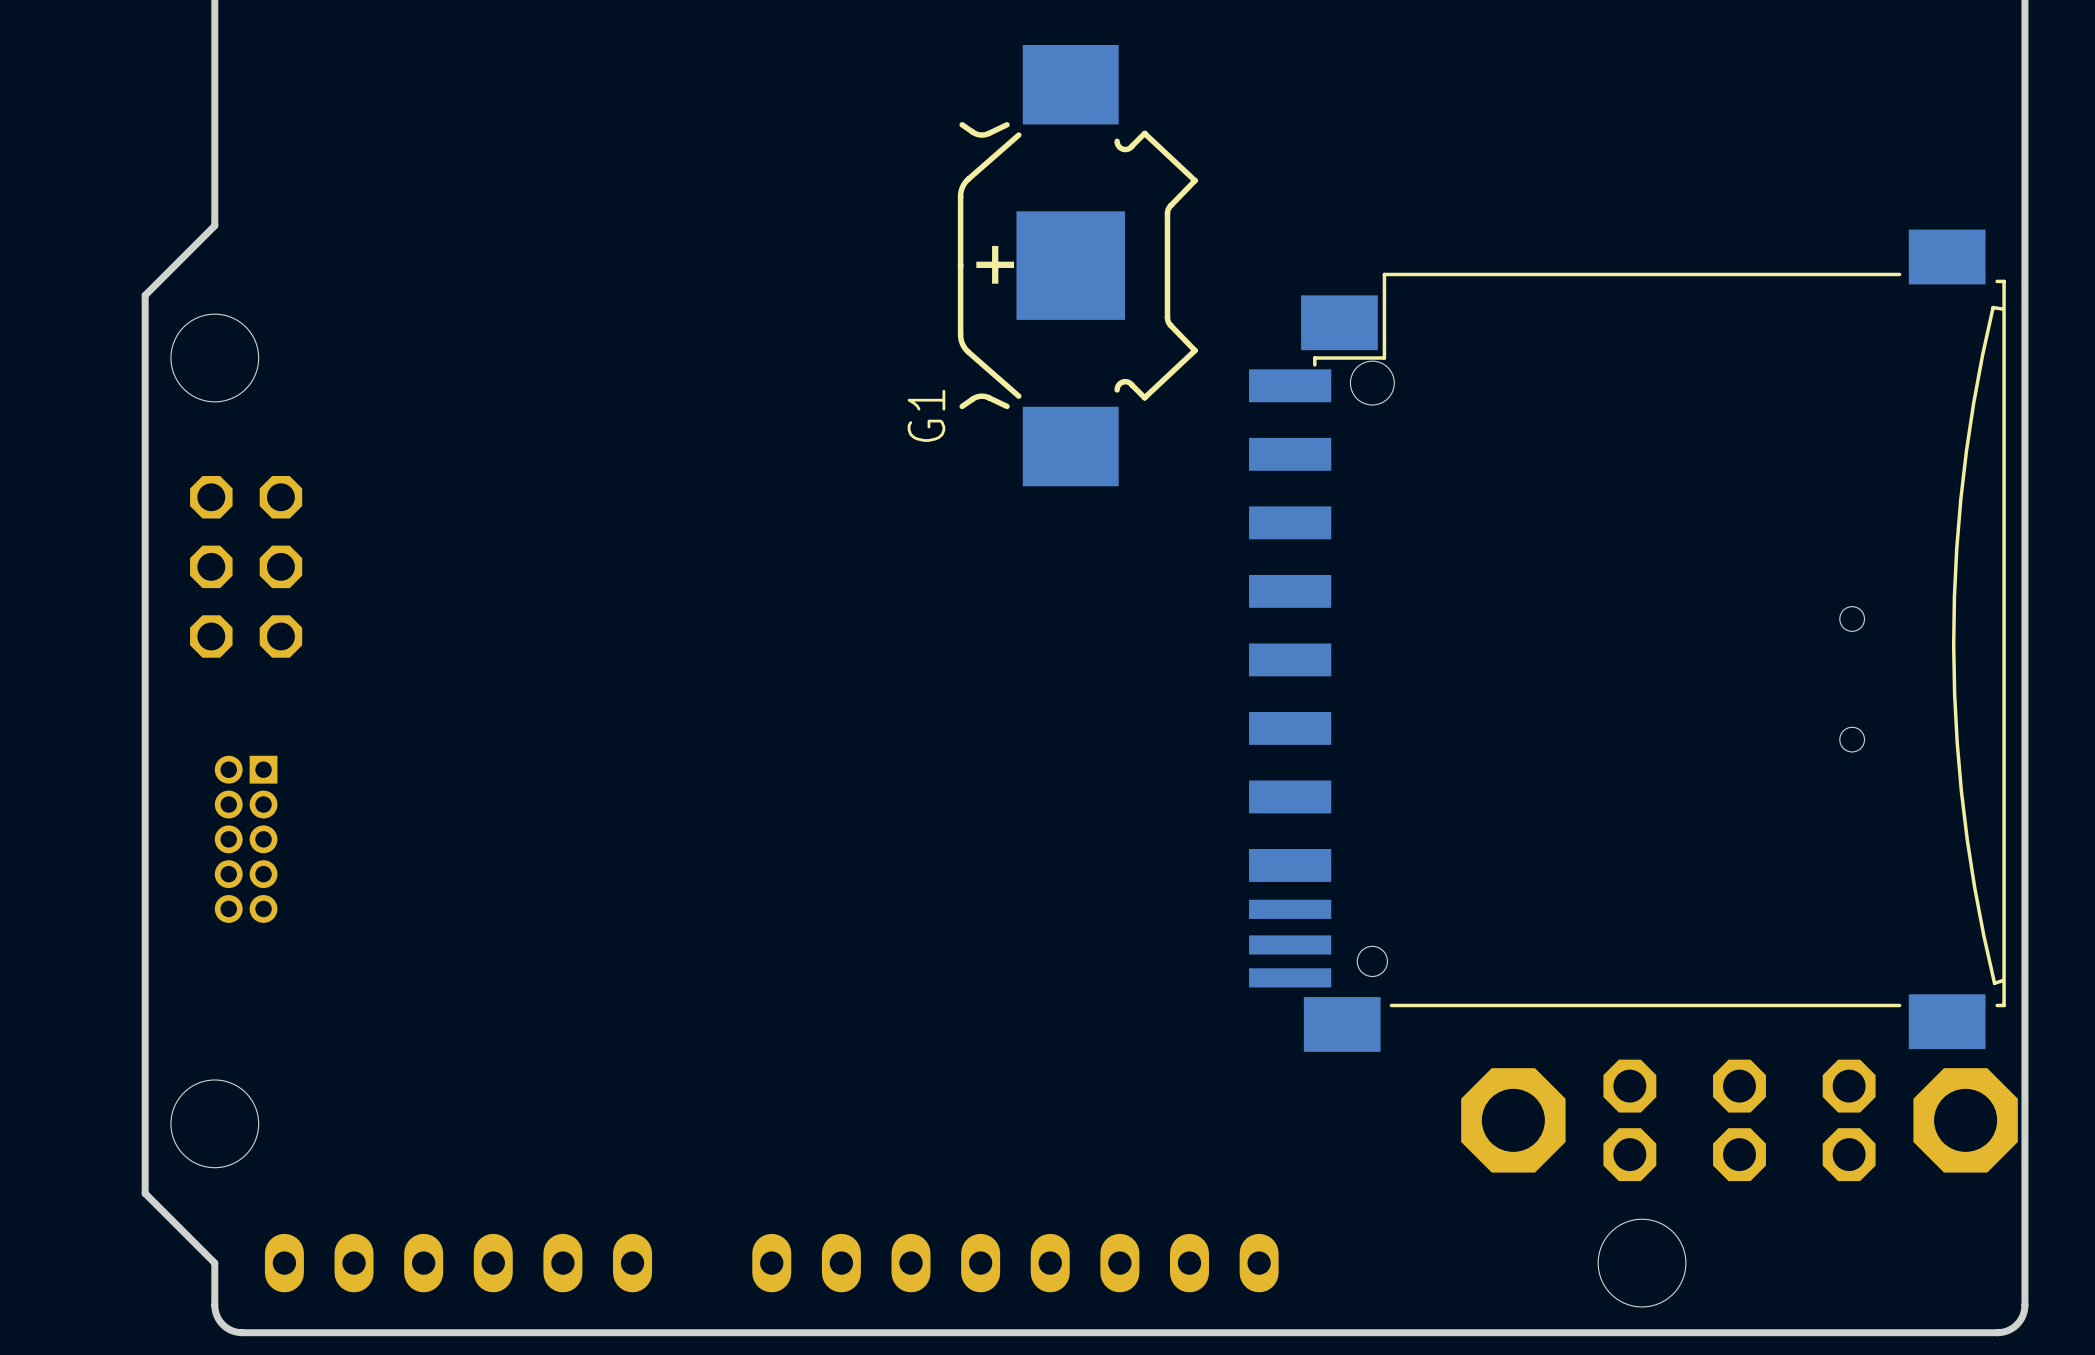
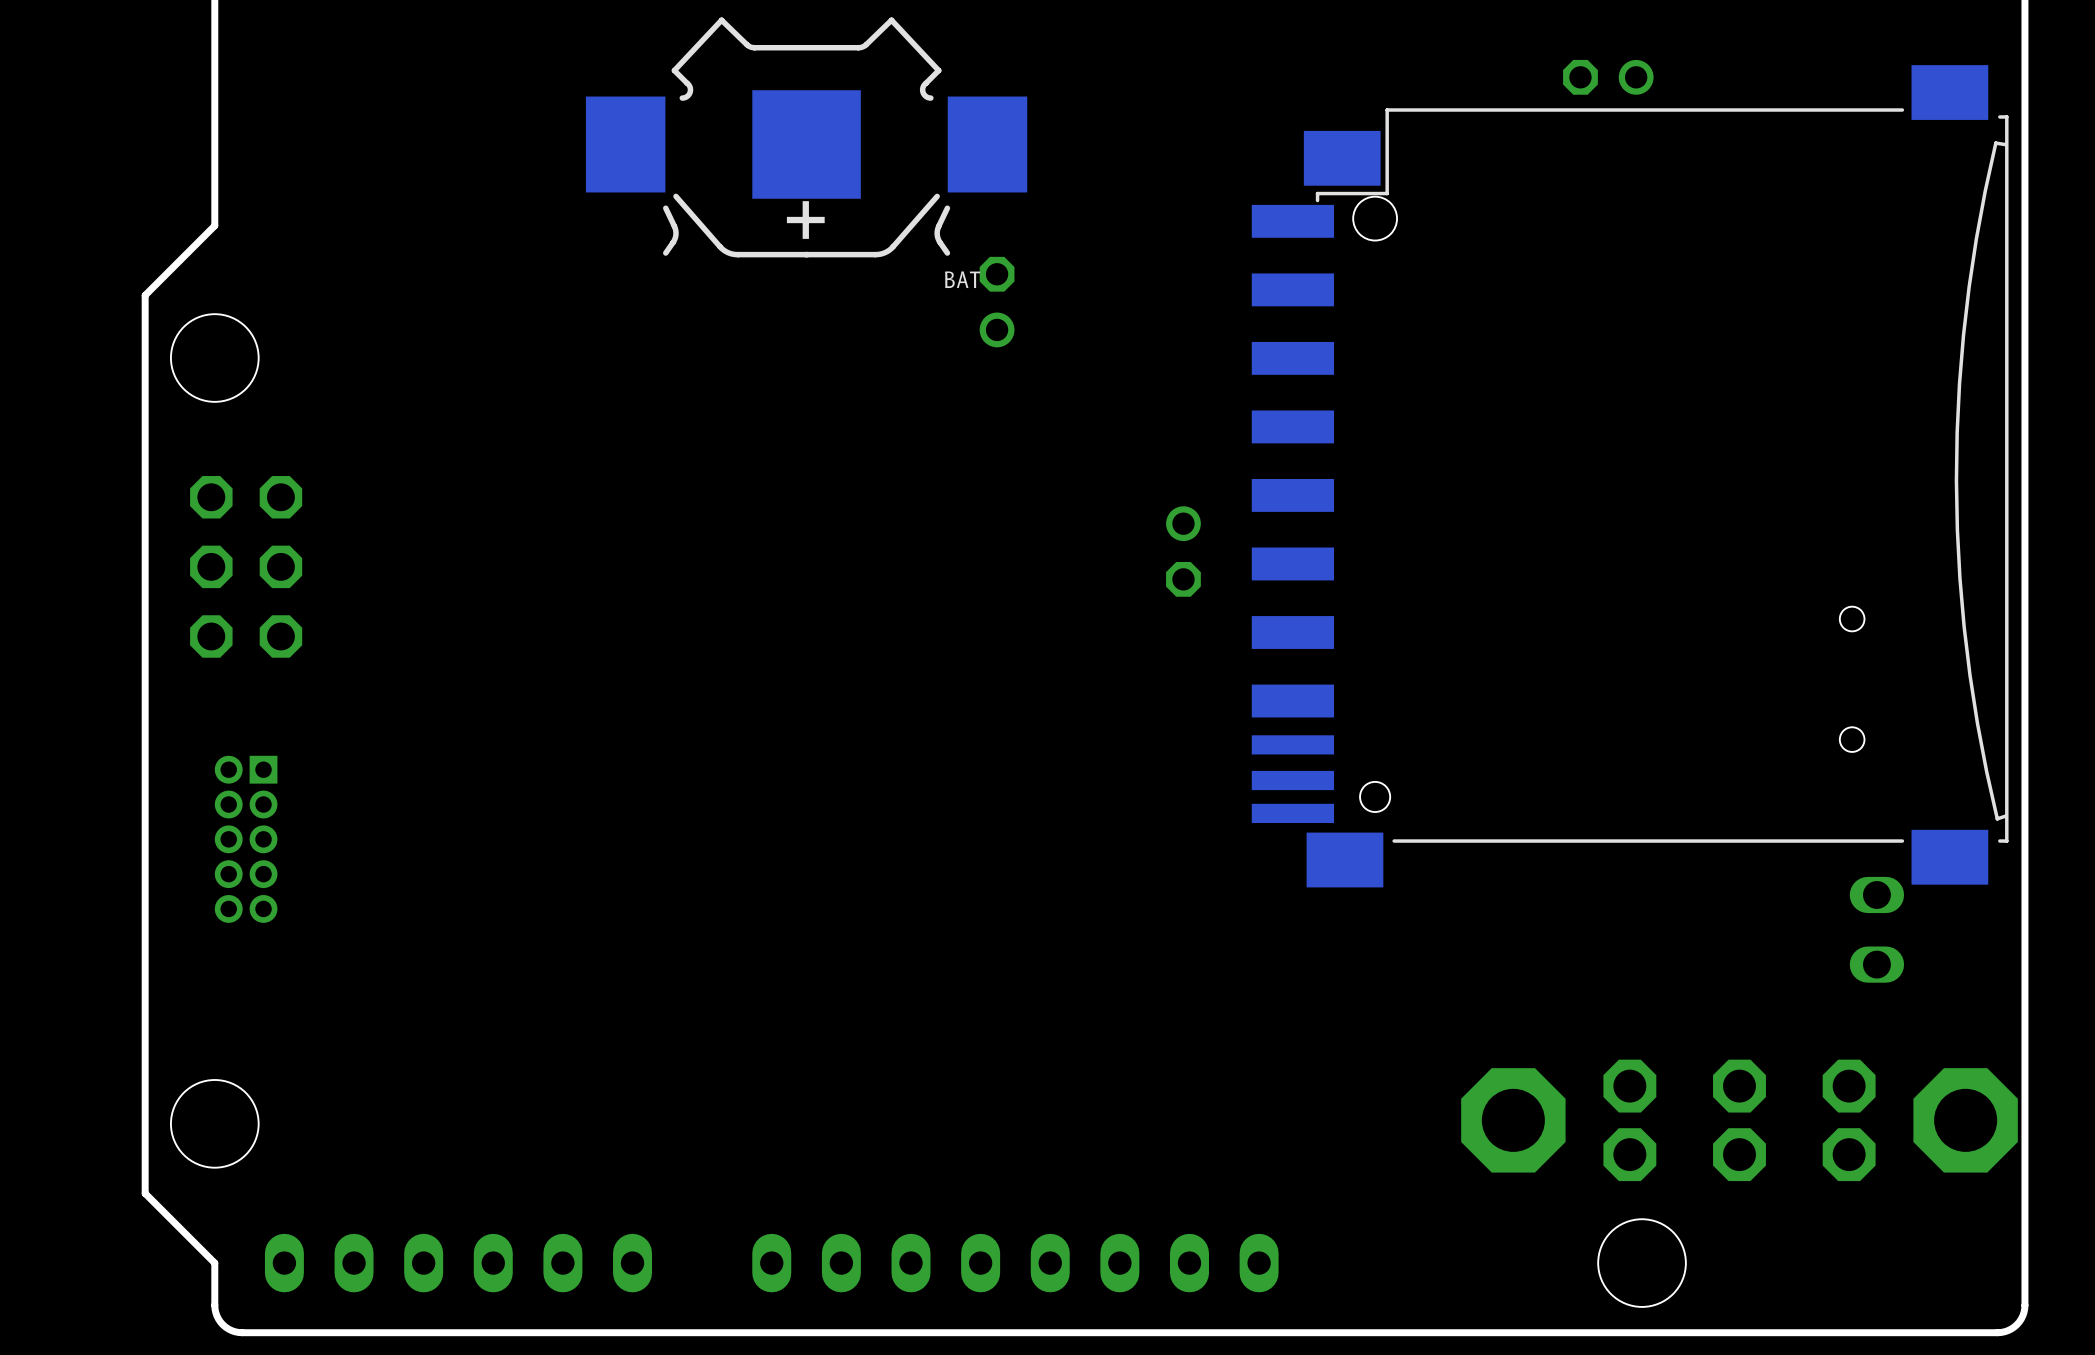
part: none -> (1608, 77)
BAT: none -> (806, 137)
G1: (1077, 265) -> none
part: none -> (997, 302)
part: none -> (1183, 551)
part position: (1627, 640) -> (1630, 476)
part: none -> (1876, 929)

